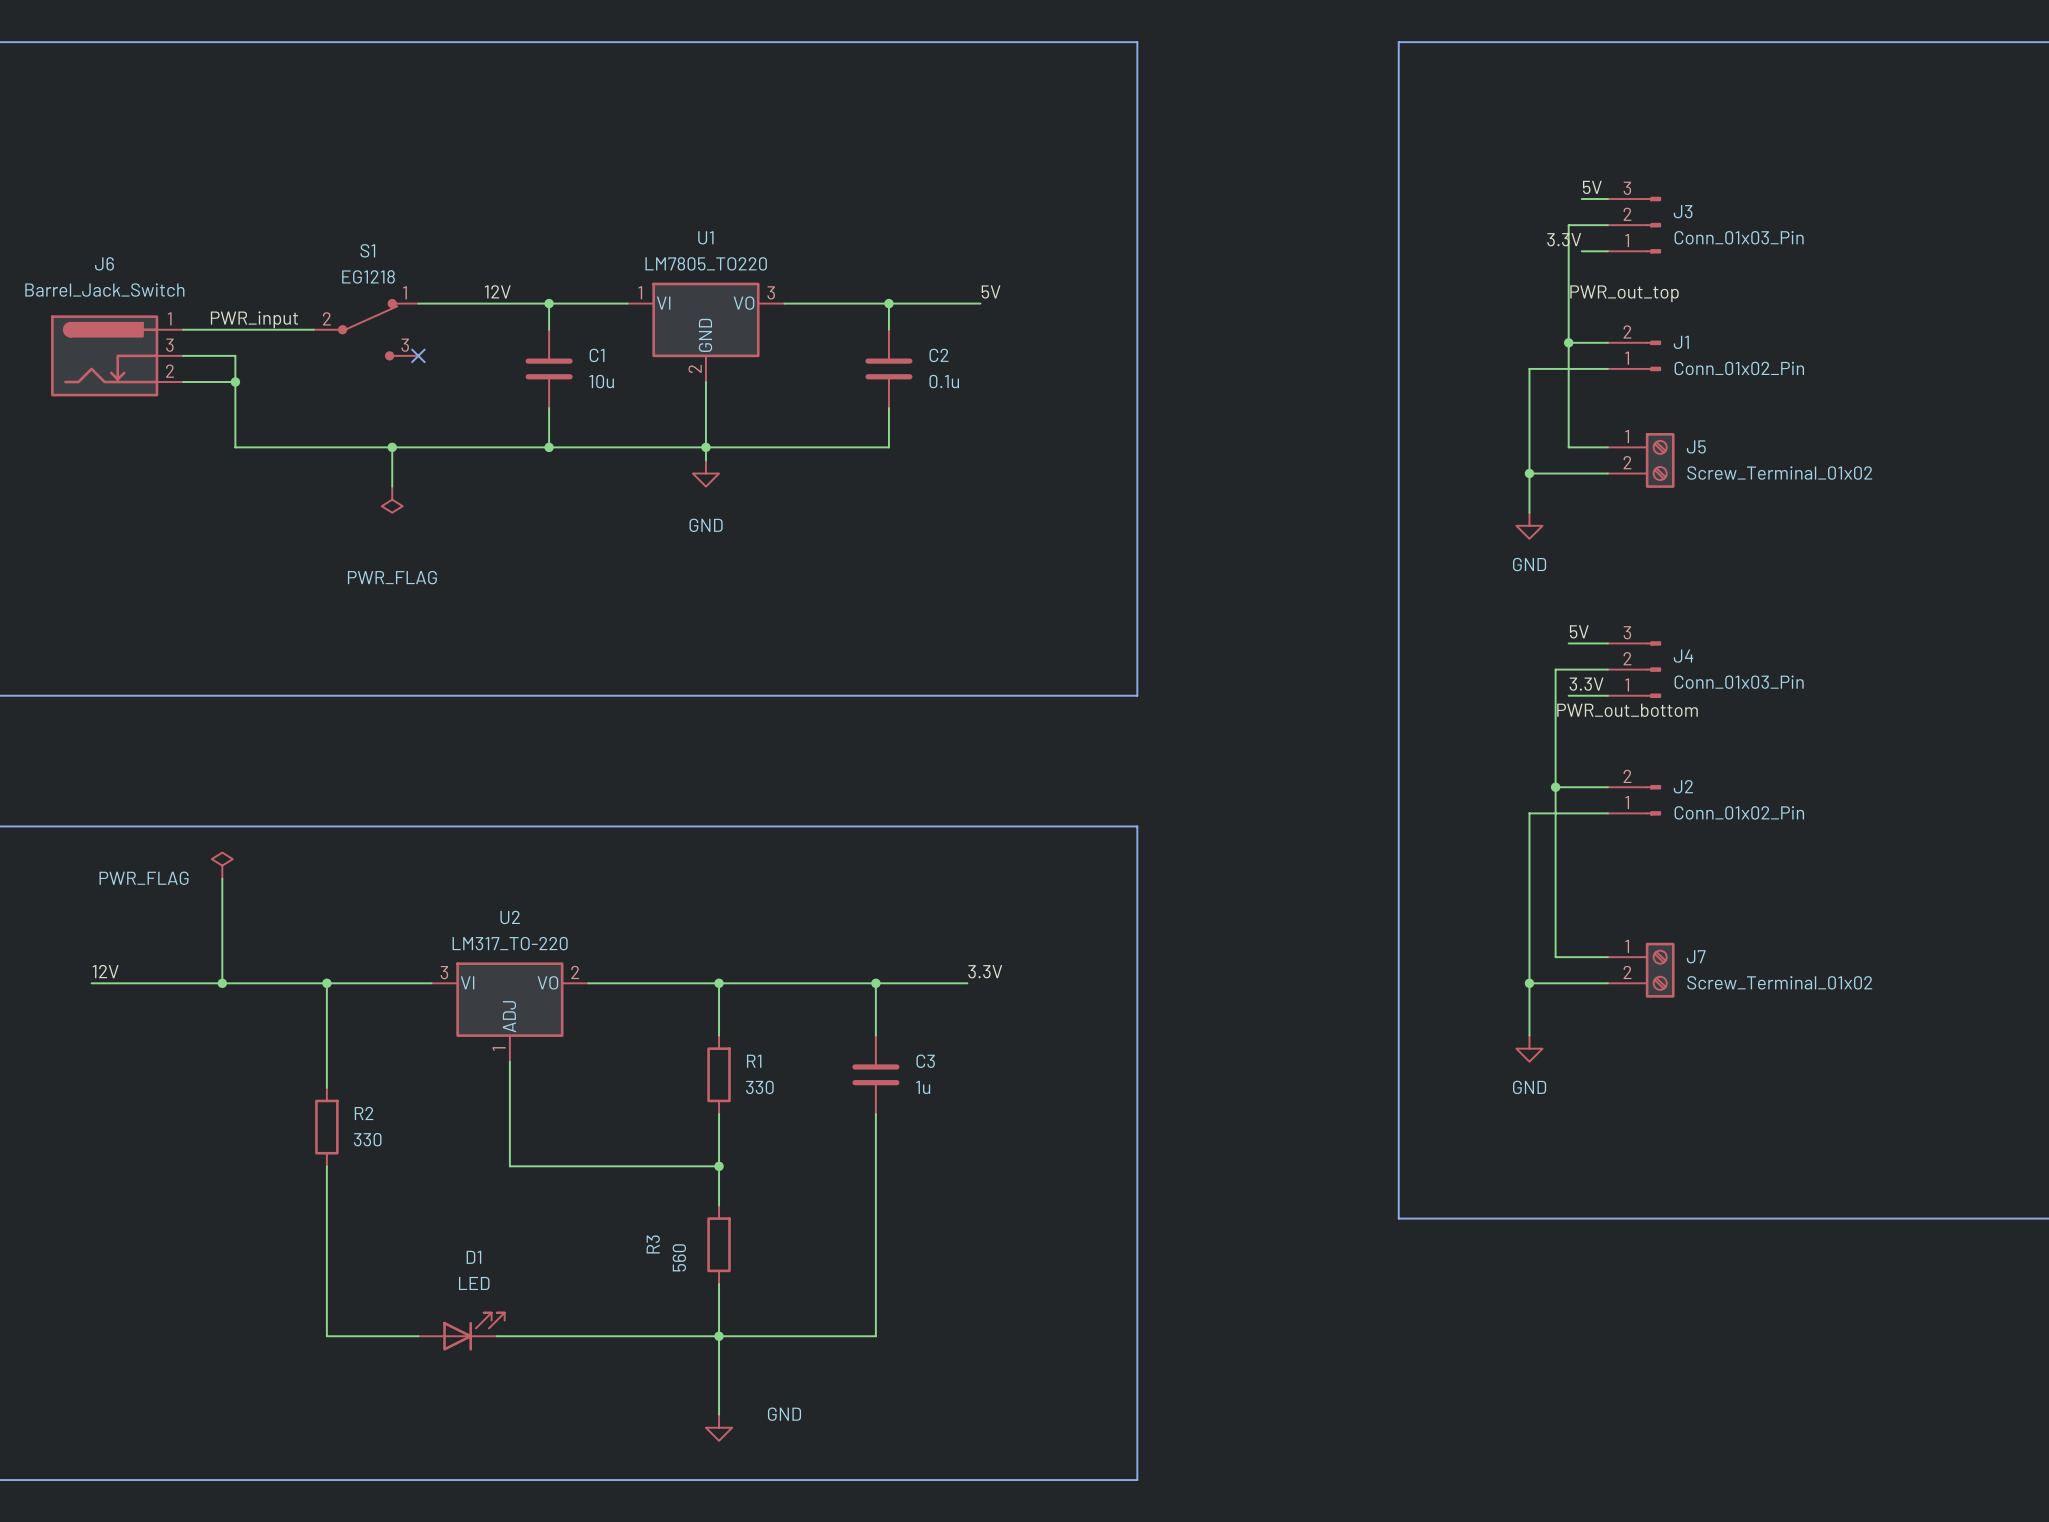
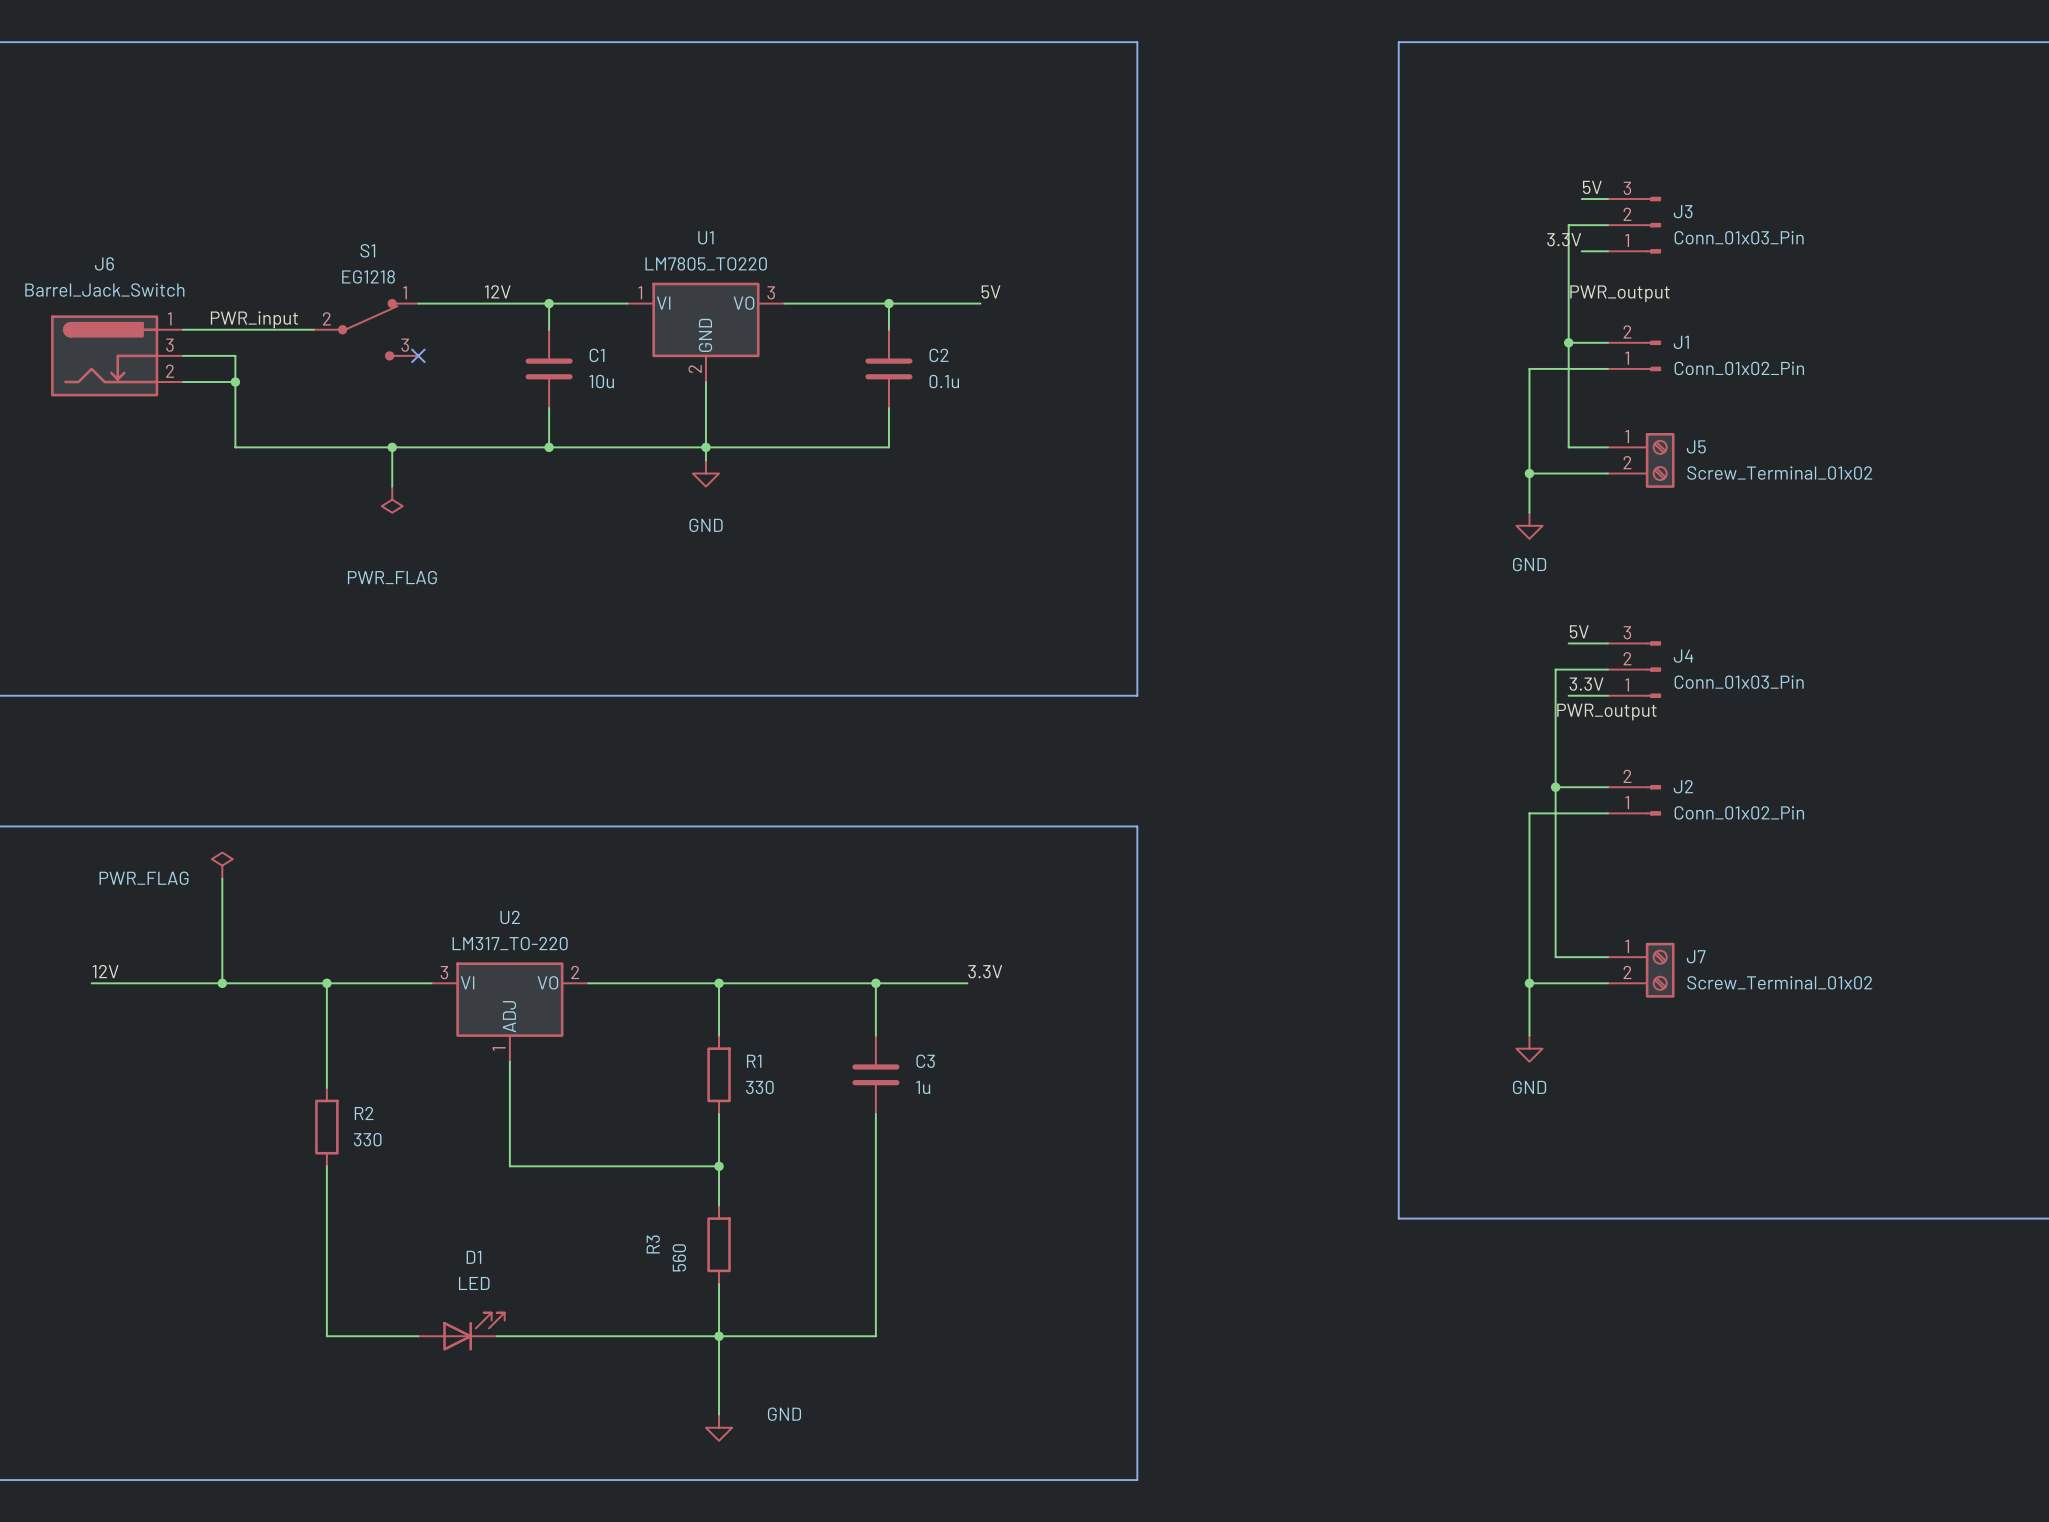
label: PWR_out_top (1624, 293) -> PWR_output (1619, 293)
label: PWR_out_bottom (1627, 710) -> PWR_output (1606, 712)

